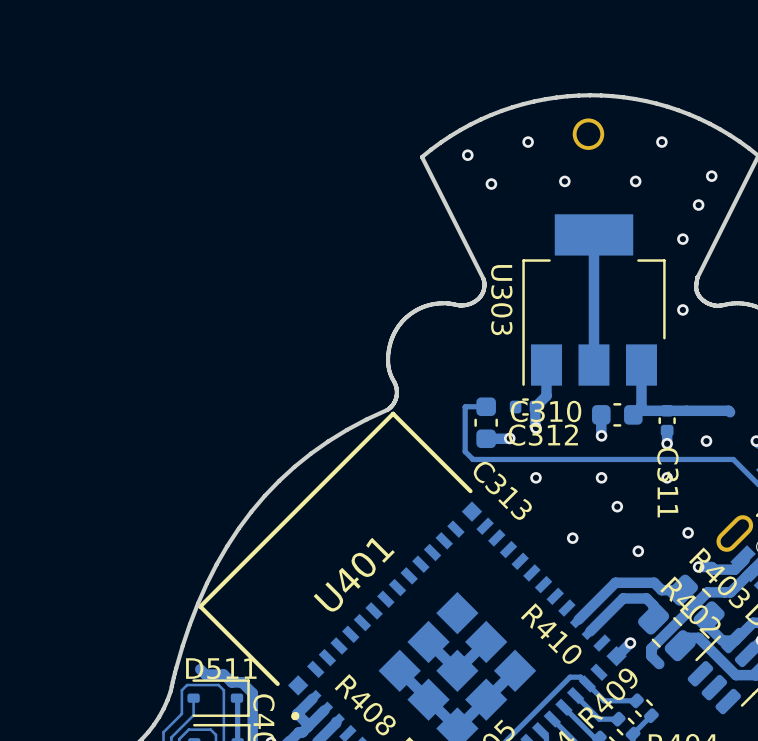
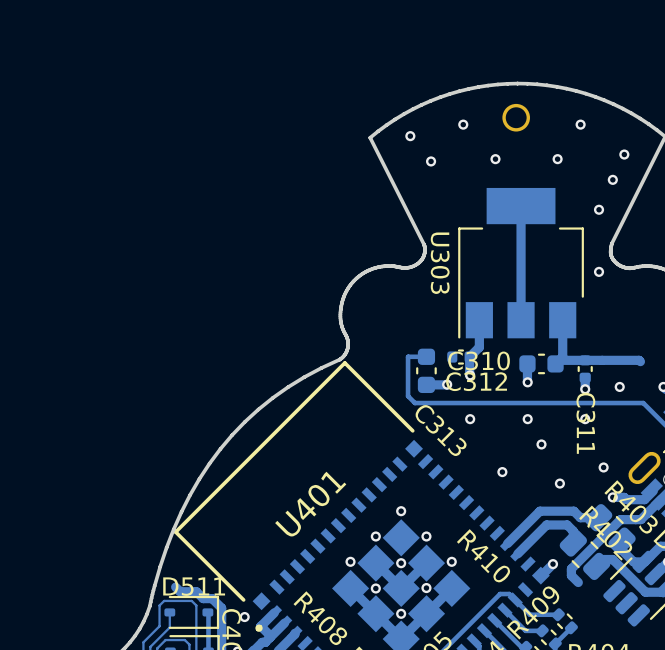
via: none -> (401, 511)
via: none -> (375, 536)
via: none -> (426, 536)
via: none -> (350, 561)
via: none -> (451, 561)
via: none -> (401, 563)
via: none -> (375, 588)
via: none -> (426, 588)
via: none -> (401, 613)
via: none -> (244, 617)

